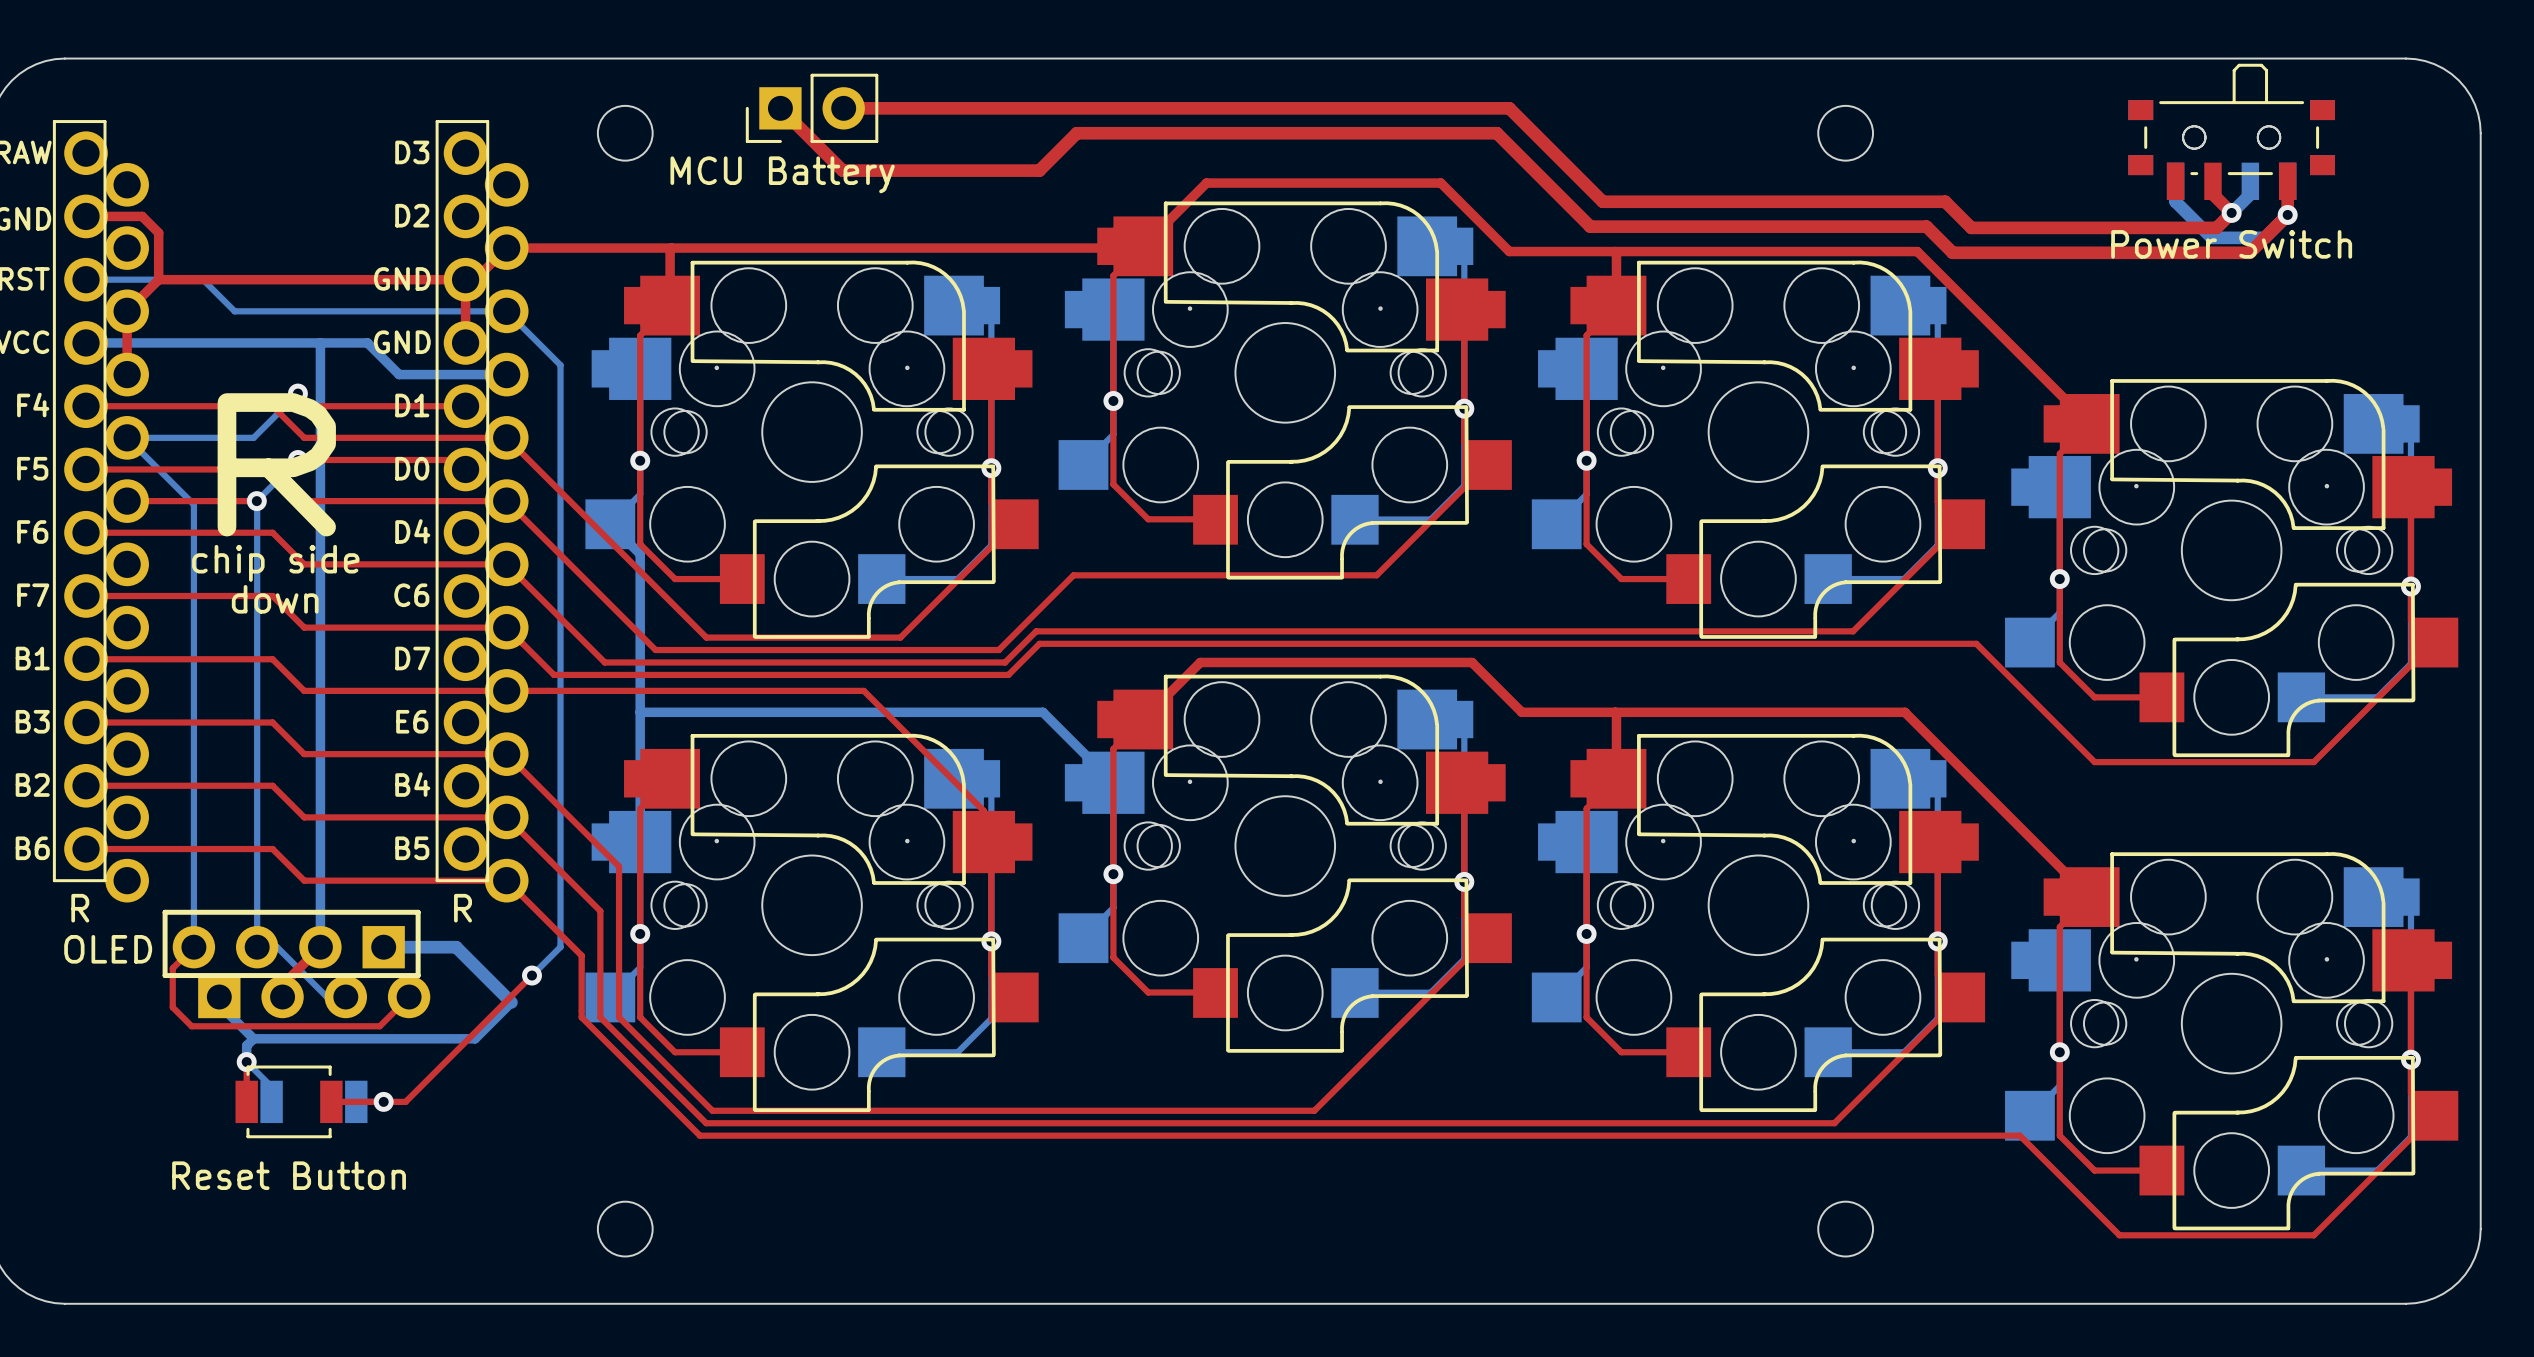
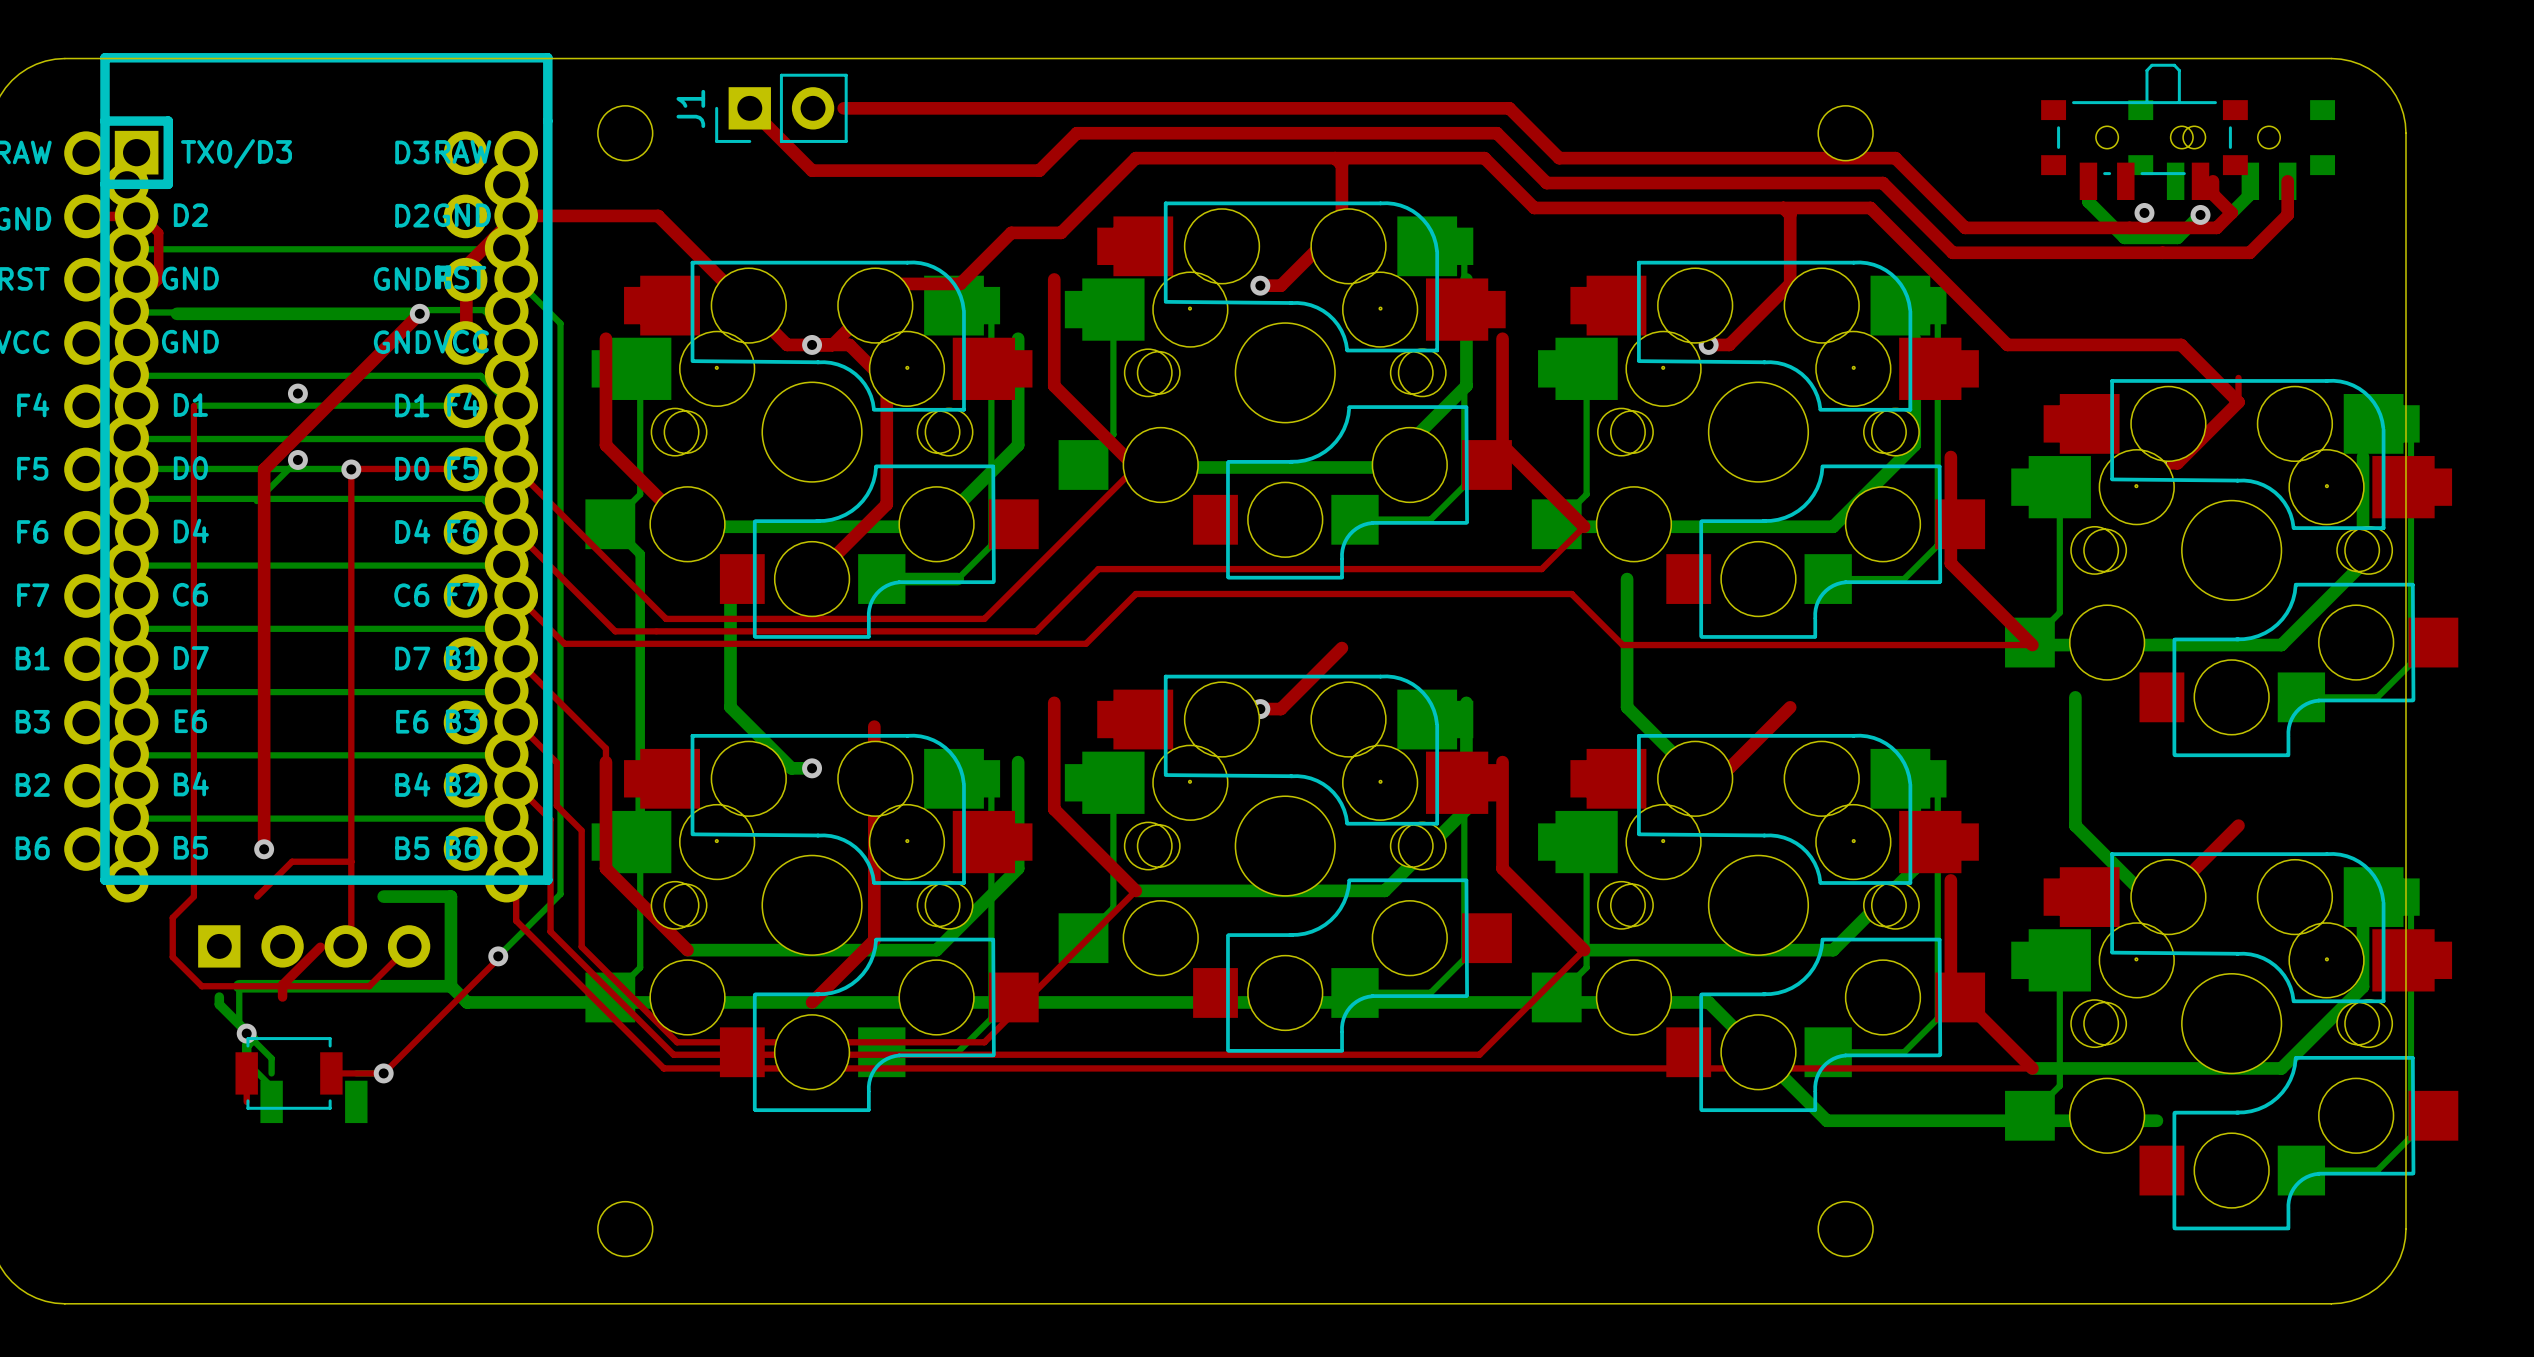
board edge: (2331, 58) (2405, 58) (2434, 64) (2451, 73) (2465, 87) (2475, 104) (2480, 123) (2480, 1229) (2478, 1248) (2470, 1266) (2458, 1281) (2443, 1293) (2415, 1303) (2331, 1303) -> (2331, 58) (2359, 64) (2384, 80) (2400, 104) (2405, 133) (2405, 1229) (2400, 1257) (2384, 1281) (2359, 1298) (2331, 1303)
top track: (780, 108) (842, 170) -> (749, 108) (812, 170) (842, 170)
J1: none -> (781, 108)
part: (812, 108) -> none
line: (54, 121) (105, 121) (105, 880) (54, 880) (54, 121) -> none
line: (437, 121) (487, 121) (487, 880) (437, 880) (437, 121) -> none
part position: (2231, 131) -> (2144, 131)
top track: none -> (1335, 158) (1341, 165) (1341, 224) (1280, 285) (1260, 285)
top track: (1559, 158) (1602, 201) (1945, 201) (1971, 227) -> (1559, 158) (1895, 158) (1965, 227) (1971, 227)
text: MCU Battery (782, 174) -> none
bottom track: (2175, 181) (2175, 201) (2211, 237) (2264, 237) (2287, 214) -> (2088, 181) (2088, 201) (2124, 237) (2177, 237) (2200, 214)
top track: (1546, 183) (1590, 226) (1926, 226) -> (1546, 183) (1882, 183) (1926, 226)
top track: none -> (1783, 207) (1790, 214) (1790, 283) (1729, 344) (1708, 344)
via: none -> (2144, 212)
via position: (2231, 212) -> (2200, 214)
via: (2287, 214) -> none
text: Power Switch (2231, 244) -> none
top track: (1143, 245) (1113, 275) (1113, 484) (1148, 519) (1215, 519) -> none
top track: (671, 248) (670, 305) (640, 335) (640, 544) (675, 579) (742, 579) -> none
top track: (1615, 251) (1616, 305) (1586, 335) (1586, 544) (1621, 579) (1688, 579) -> none
bottom track: (86, 279) (203, 279) (234, 311) (506, 311) (560, 365) -> (86, 279) (116, 249) (486, 249) (560, 323) (560, 365)
top track: (158, 279) (475, 279) (506, 248) (1141, 248) (1206, 183) (1440, 183) (1509, 251) (1917, 251) (2089, 423) (2059, 453) (2059, 662) (2094, 697) (2161, 697) -> none
top track: none -> (1054, 279) (1054, 385) (1135, 467) (984, 618) (666, 618) (516, 468)
bottom track: none -> (1466, 279) (1466, 385) (1384, 467) (1135, 467)
via: none -> (1260, 285)
top track: (1456, 309) (1464, 316) (1464, 442) (1486, 464) -> none
top track: none -> (419, 313) (264, 469) (264, 849)
via: none -> (419, 313)
top track: none -> (605, 338) (605, 445) (687, 526)
bottom track: none -> (1018, 338) (1018, 445) (936, 526) (687, 526)
top track: none -> (1502, 338) (1502, 445) (1584, 526) (1541, 569) (1098, 569) (1036, 631) (615, 631) (516, 532)
bottom track: none -> (1914, 338) (1914, 445) (1833, 526) (1584, 526)
bottom track: (86, 342) (367, 342) (399, 374) (506, 374) -> (86, 342) (116, 312) (419, 313) (423, 310) (483, 310) (516, 342)
top track: none -> (466, 342) (466, 265) (516, 215) (658, 215) (787, 344) (849, 344) (886, 382) (886, 504) (812, 579)
bottom track: (320, 343) (320, 947) -> none
via: none -> (812, 344)
top track: none -> (832, 344) (893, 283) (960, 283) (1011, 232) (1061, 232) (1135, 158) (1484, 158) (1534, 207) (1870, 207) (2007, 344) (2181, 344) (2238, 402)
via: none -> (1708, 344)
top track: (983, 368) (991, 376) (991, 501) (1013, 524) (900, 637) (706, 637) (506, 437) (304, 437) (272, 406) (86, 406) -> none
top track: (1930, 368) (1937, 376) (1937, 501) (1960, 524) (1853, 631) (1036, 631) (1005, 662) (604, 662) (506, 564) (304, 564) (272, 532) (86, 532) -> none
top track: none -> (2238, 377) (2238, 402)
top track: (297, 393) (310, 406) (465, 406) -> none
bottom track: (297, 393) (253, 437) (127, 437) (193, 504) (193, 947) -> none
via: (1113, 400) -> none
top track: none -> (2238, 402) (2177, 463) (2156, 463)
bottom track: none -> (86, 405) (116, 375) (480, 375) (510, 405) (516, 405)
top track: none -> (193, 405) (193, 896) (172, 917) (172, 957) (201, 986) (369, 986) (409, 946)
bottom track: none -> (194, 405) (466, 405)
via: (1464, 408) -> none
bottom track: none -> (2363, 457) (2363, 563) (2281, 645) (2032, 645)
top track: (297, 459) (456, 459) (466, 468) -> (345, 946) (351, 940) (351, 469) (466, 468)
via: (640, 460) -> none
via: (1586, 460) -> none
text: R (276, 464) -> none
top track: (1486, 464) (1376, 575) (1073, 575) (998, 650) (655, 650) (506, 501) (304, 501) (272, 469) (86, 469) -> none
bottom track: none -> (86, 468) (116, 439) (486, 439) (516, 468)
bottom track: none -> (136, 468) (351, 469)
part: none -> (326, 468)
via: (991, 468) -> none
via: (1937, 468) -> none
top track: (2403, 487) (2410, 494) (2410, 620) (2433, 642) (2313, 762) (2094, 762) (1976, 643) (1086, 643) -> (1950, 457) (1950, 563) (2032, 645) (1622, 645) (1571, 594) (1135, 594) (1086, 643)
top track: (127, 501) (256, 501) -> none
via position: (256, 501) -> (351, 469)
bottom track: (257, 501) (257, 947) (277, 947) (326, 997) (345, 997) -> none
bottom track: none -> (86, 532) (120, 498) (482, 498) (516, 532)
text: chip side (275, 563) -> none
bottom track: none -> (729, 579) (730, 707) (791, 768) (812, 768)
bottom track width: thin (881, 579) (957, 579) -> thick (881, 579) (957, 579)
bottom track: none -> (1627, 579) (1627, 707) (1688, 768) (1708, 768)
via: (2059, 579) -> none
via: (2410, 586) -> none
top track: (86, 595) (272, 595) (304, 627) (506, 627) (554, 674) (1008, 674) (1039, 643) -> (516, 584) (516, 595) (564, 643) (1039, 643)
bottom track: none -> (86, 595) (116, 565) (486, 565) (516, 595)
text: down (275, 599) -> none
top track: none -> (1341, 648) (1280, 709) (1260, 709)
bottom track: none -> (86, 658) (116, 628) (486, 628) (516, 658)
top track: none -> (516, 658) (605, 748) (605, 868) (687, 950)
top track: (86, 659) (272, 659) (304, 690) (863, 690) (983, 810) (983, 842) (991, 849) (991, 975) (1013, 997) -> none
bottom track: none -> (2075, 697) (2075, 825) (2136, 886) (2156, 886)
top track: none -> (1054, 702) (1054, 809) (1135, 890) (984, 1042) (677, 1042) (581, 946) (581, 830) (556, 805) (556, 762) (516, 722)
bottom track: none -> (1466, 702) (1466, 809) (1384, 890) (1135, 890)
top track: none -> (1790, 707) (1729, 768) (1708, 768)
via: none -> (1260, 709)
bottom track: (640, 712) (1042, 712) (1113, 782) -> none
top track: (1615, 712) (1616, 778) (1586, 808) (1586, 1017) (1621, 1052) (1688, 1052) -> none
top track: (1143, 719) (1113, 748) (1113, 957) (1148, 992) (1215, 992) -> none
top track: (1143, 719) (1200, 662) (1472, 662) (1521, 712) (1904, 712) (2089, 897) (2059, 926) (2059, 1135) (2094, 1170) (2161, 1170) -> none
top track: (86, 722) (272, 722) (304, 754) (506, 754) -> none
bottom track: none -> (86, 722) (116, 692) (486, 692) (516, 722)
top track: none -> (874, 726) (874, 940) (812, 1002)
top track: (506, 754) (619, 866) (619, 1017) (712, 1110) (1314, 1110) (1486, 938) -> none
bottom track: none -> (1018, 762) (1018, 868) (936, 950) (687, 950)
top track: none -> (1502, 762) (1502, 868) (1584, 950) (1479, 1054) (673, 1054) (550, 931) (550, 819) (516, 785)
bottom track: none -> (1914, 762) (1914, 868) (1833, 950) (1584, 950)
via: none -> (812, 768)
top track: (670, 778) (640, 808) (640, 1017) (675, 1052) (742, 1052) -> none
top track: (1456, 782) (1464, 790) (1464, 915) (1486, 937) -> none
top track: (86, 785) (272, 785) (304, 817) (506, 817) (600, 911) (600, 1017) (706, 1123) (1834, 1123) (1960, 997) (1937, 975) (1937, 849) (1930, 842) -> none
bottom track: none -> (86, 785) (116, 755) (486, 755) (516, 785)
top track: none -> (2238, 825) (2177, 886) (2156, 886)
bottom track: none -> (86, 848) (116, 818) (486, 818) (516, 848)
top track: none -> (516, 848) (516, 920) (663, 1068) (2032, 1068)
top track: (86, 849) (272, 849) (304, 880) (506, 880) (581, 955) (581, 1017) (699, 1135) (2019, 1135) (2119, 1235) (2313, 1235) (2433, 1115) (2410, 1093) (2410, 967) (2403, 960) -> none
via: none -> (264, 849)
top track: none -> (351, 861) (292, 861) (257, 896)
via: (1113, 874) -> none
top track: none -> (1950, 880) (1950, 986) (2032, 1068)
bottom track: none -> (2363, 880) (2363, 986) (2281, 1068) (2032, 1068)
via: (1464, 881) -> none
bottom track: (560, 894) (560, 947) (532, 975) -> (560, 894) (498, 956)
bottom track: none -> (383, 896) (450, 896) (450, 986)
text: R (80, 908) -> none
text: R (463, 908) -> none
line: (165, 912) (165, 975) (418, 975) (418, 912) (165, 912) -> none
via: (640, 933) -> none
via: (1586, 933) -> none
via: (991, 941) -> none
via: (1937, 941) -> none
part: none -> (314, 946)
top track: (193, 947) (172, 968) (172, 1007) (191, 1026) (379, 1026) (409, 997) -> none
part: (288, 947) -> none
bottom track: (383, 947) (456, 947) (511, 1002) (475, 1038) (253, 1038) -> none
text: OLED (108, 949) -> none
top track: none -> (498, 956) (498, 958) (383, 1073) (331, 1073)
top track: (532, 975) (405, 1101) (331, 1101) -> none
via position: (532, 975) -> (498, 956)
bottom track: none -> (450, 986) (467, 1002) (1708, 1002) (1826, 1120) (2156, 1120)
bottom track: none -> (450, 986) (239, 986) (239, 1026) (271, 1058) (271, 1073)
part: (314, 997) -> none
via: (2059, 1052) -> none
via: (2410, 1059) -> none
via position: (246, 1062) -> (246, 1033)
part position: (289, 1101) -> (289, 1073)
via position: (383, 1101) -> (383, 1073)
text: Reset Button (289, 1175) -> none

